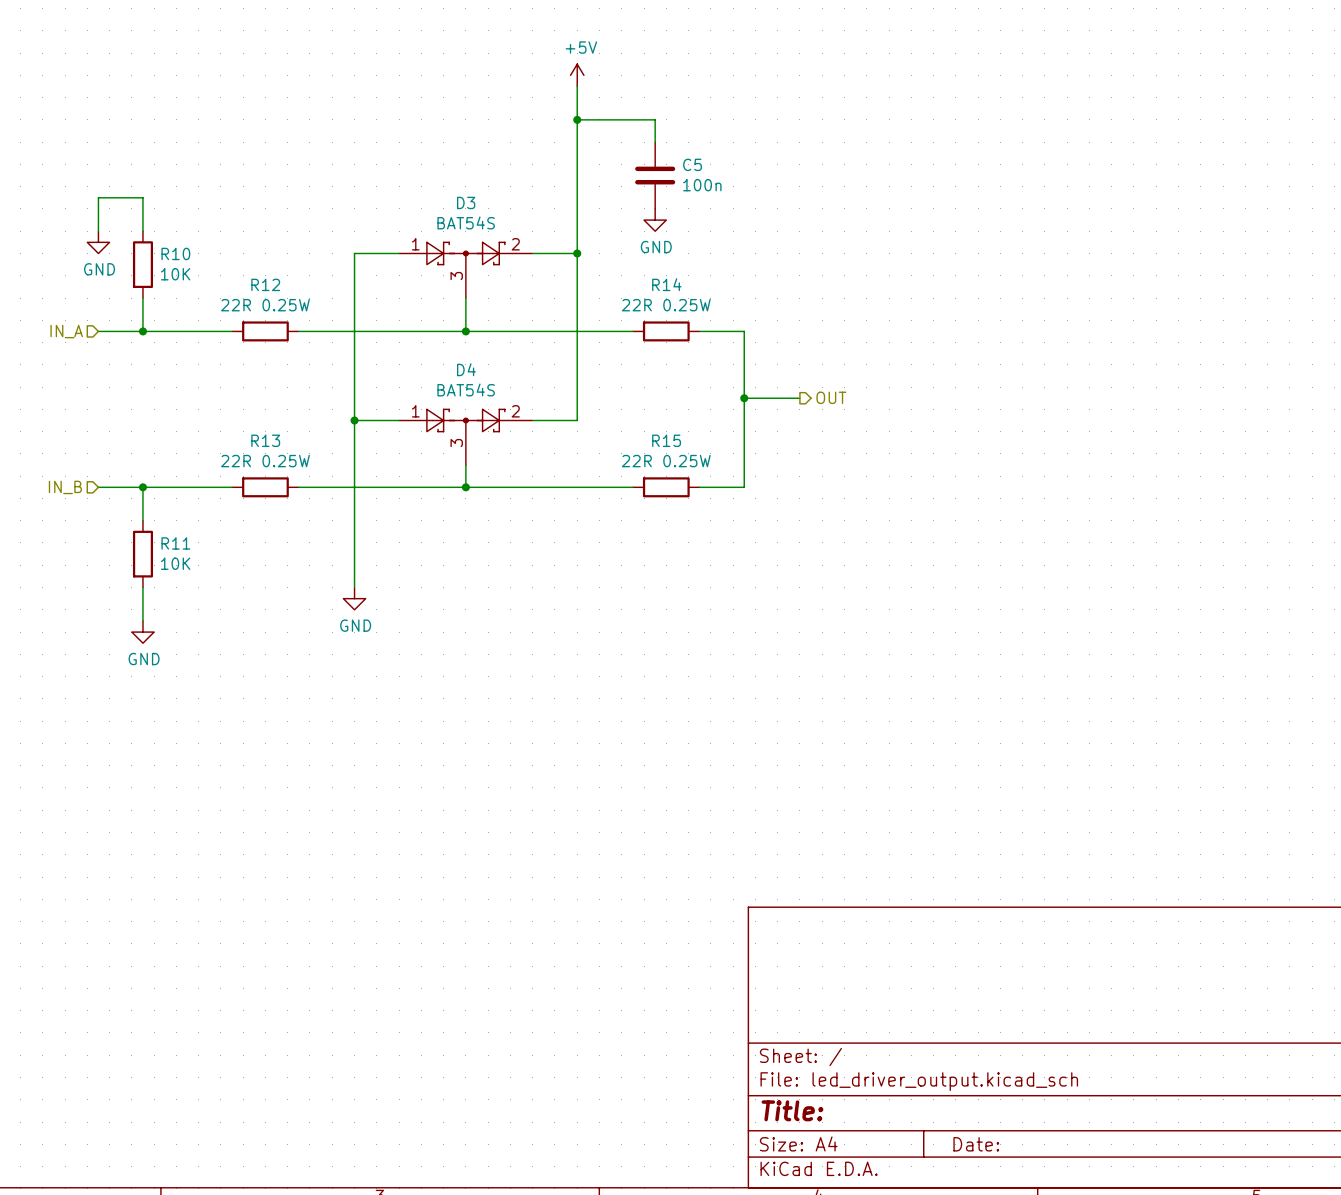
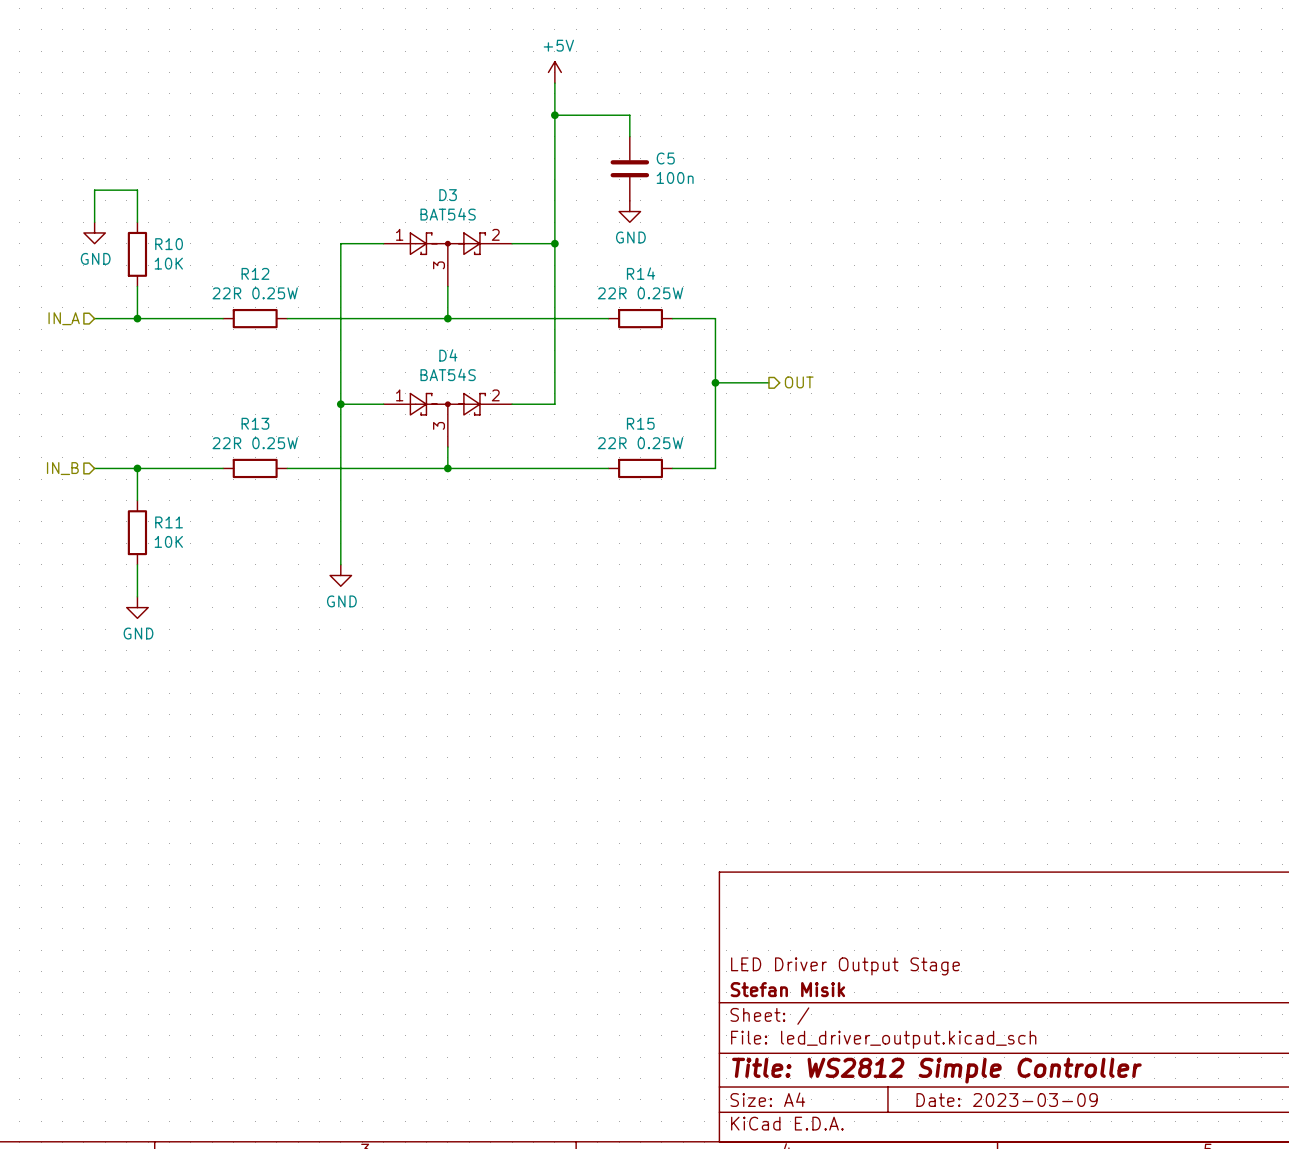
title block: none -> LED Driver Output Stage (845, 966)
title block: none -> Stefan Misik (787, 989)
title block: Title: (792, 1110) -> Title: WS2812 Simple Controller (936, 1070)
title block: Date: (976, 1144) -> Date: 2023-03-09 (1007, 1100)

